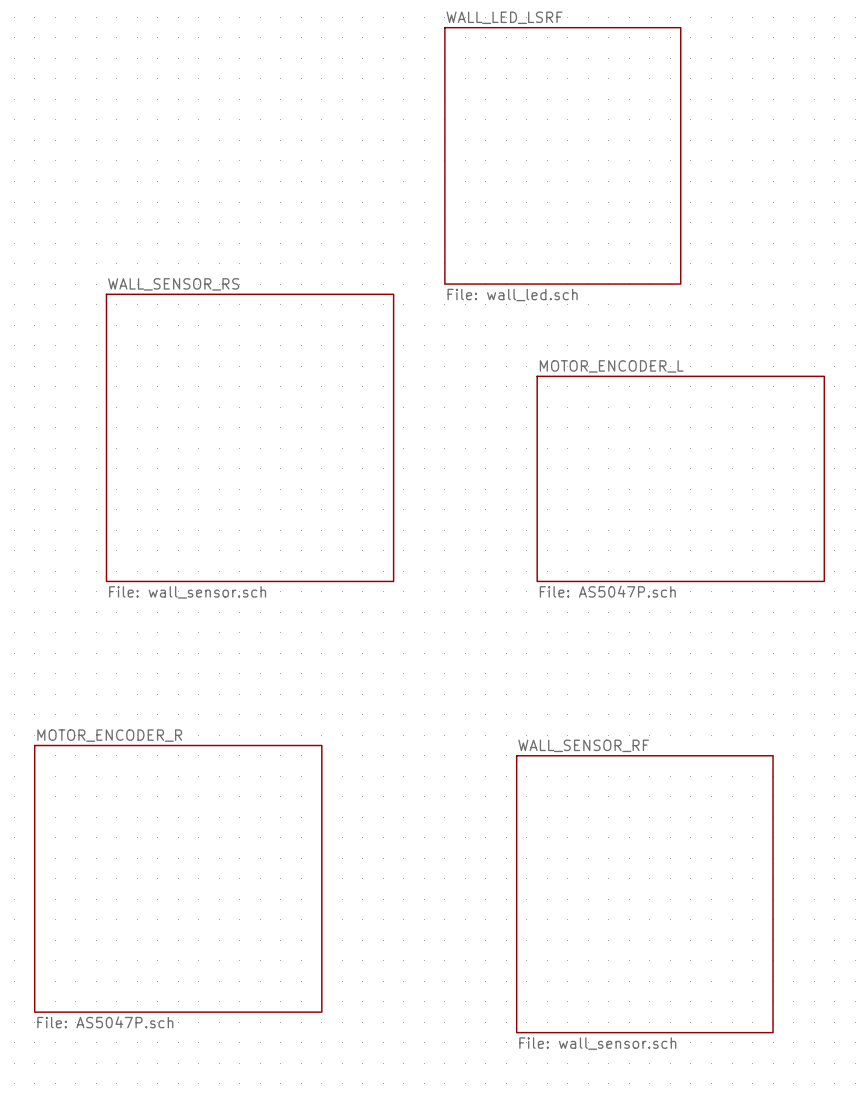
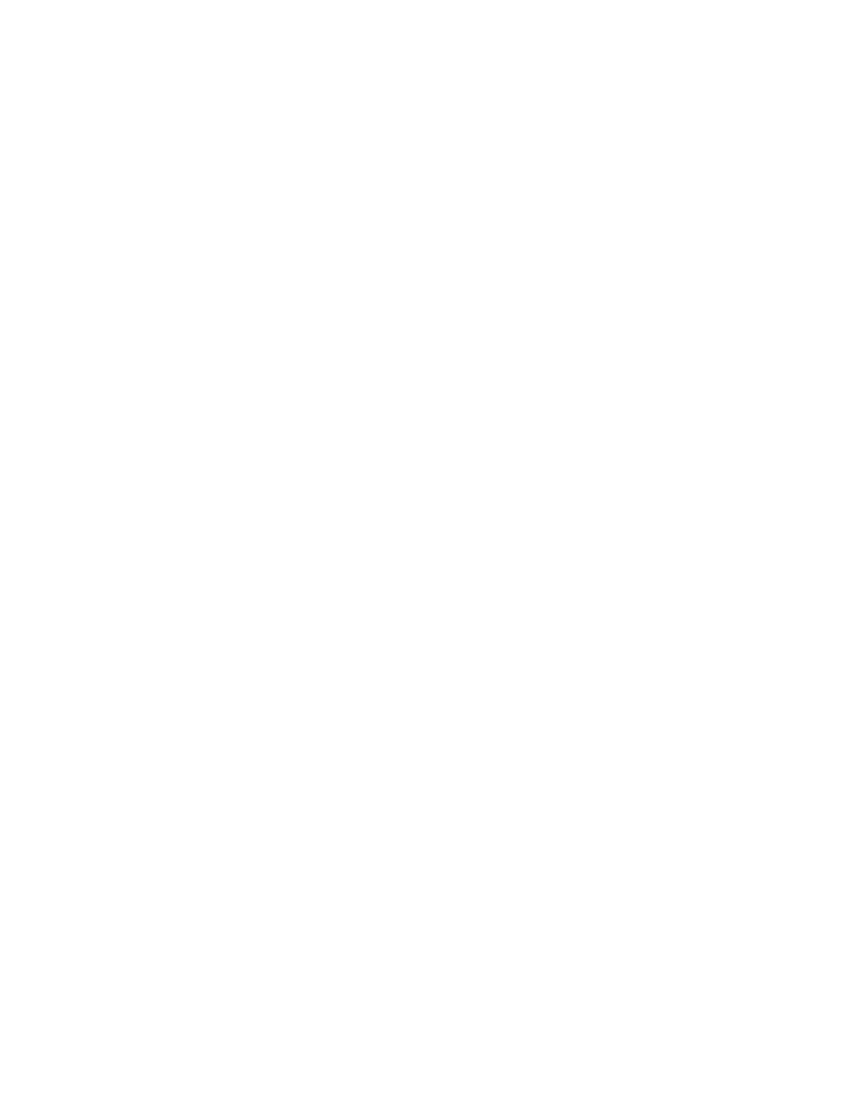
sheet WALL_LED_LSRF: File: wall_led.sch (562, 155) -> none
sheet WALL_SENSOR_RS: File: wall_sensor.sch (250, 437) -> none
sheet MOTOR_ENCODER_L: File: AS5047P.sch (680, 478) -> none
sheet MOTOR_ENCODER_R: File: AS5047P.sch (178, 878) -> none
sheet WALL_SENSOR_RF: File: wall_sensor.sch (644, 894) -> none

